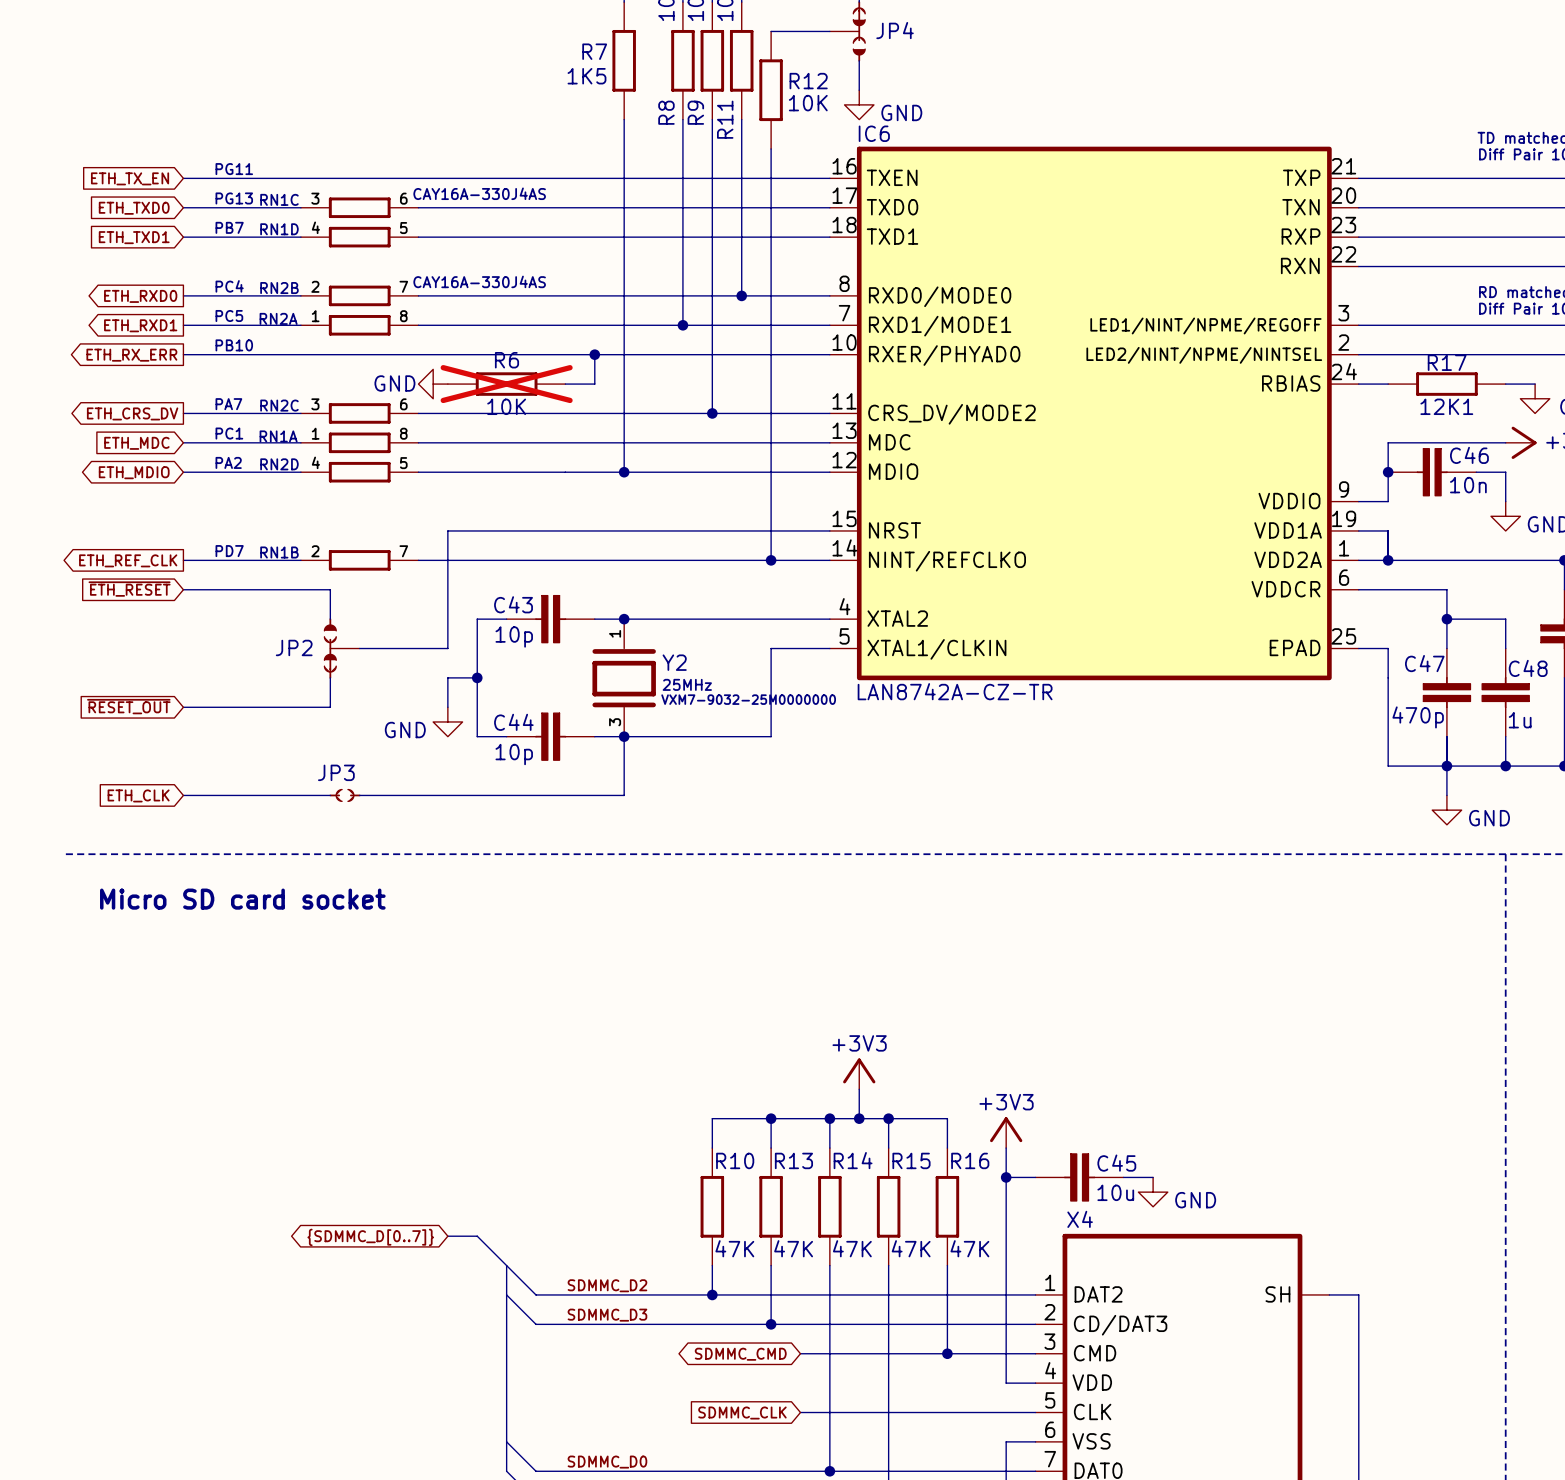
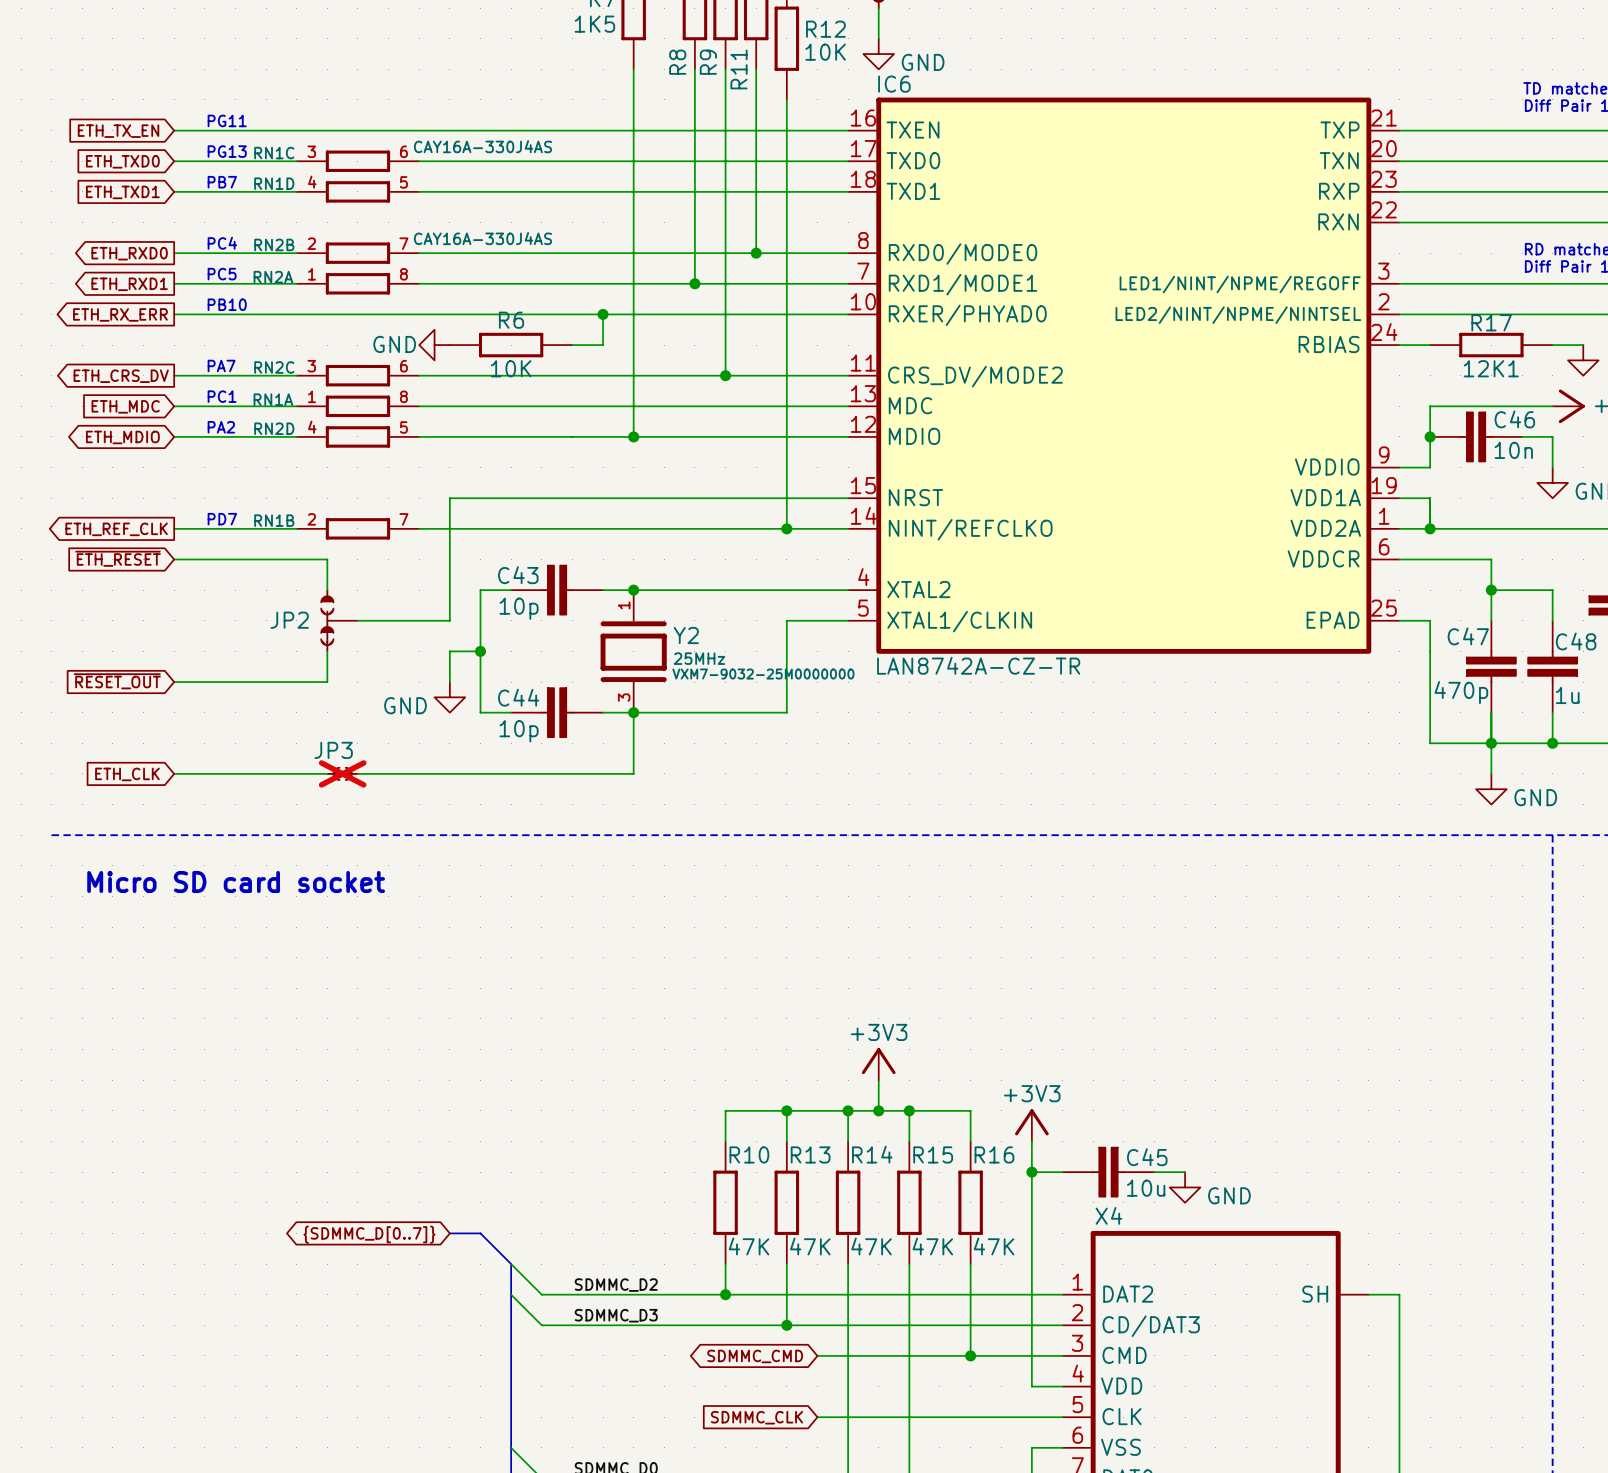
R6 do-not-place cross: (506, 384) -> none
JP3 do-not-place cross: none -> (342, 773)

